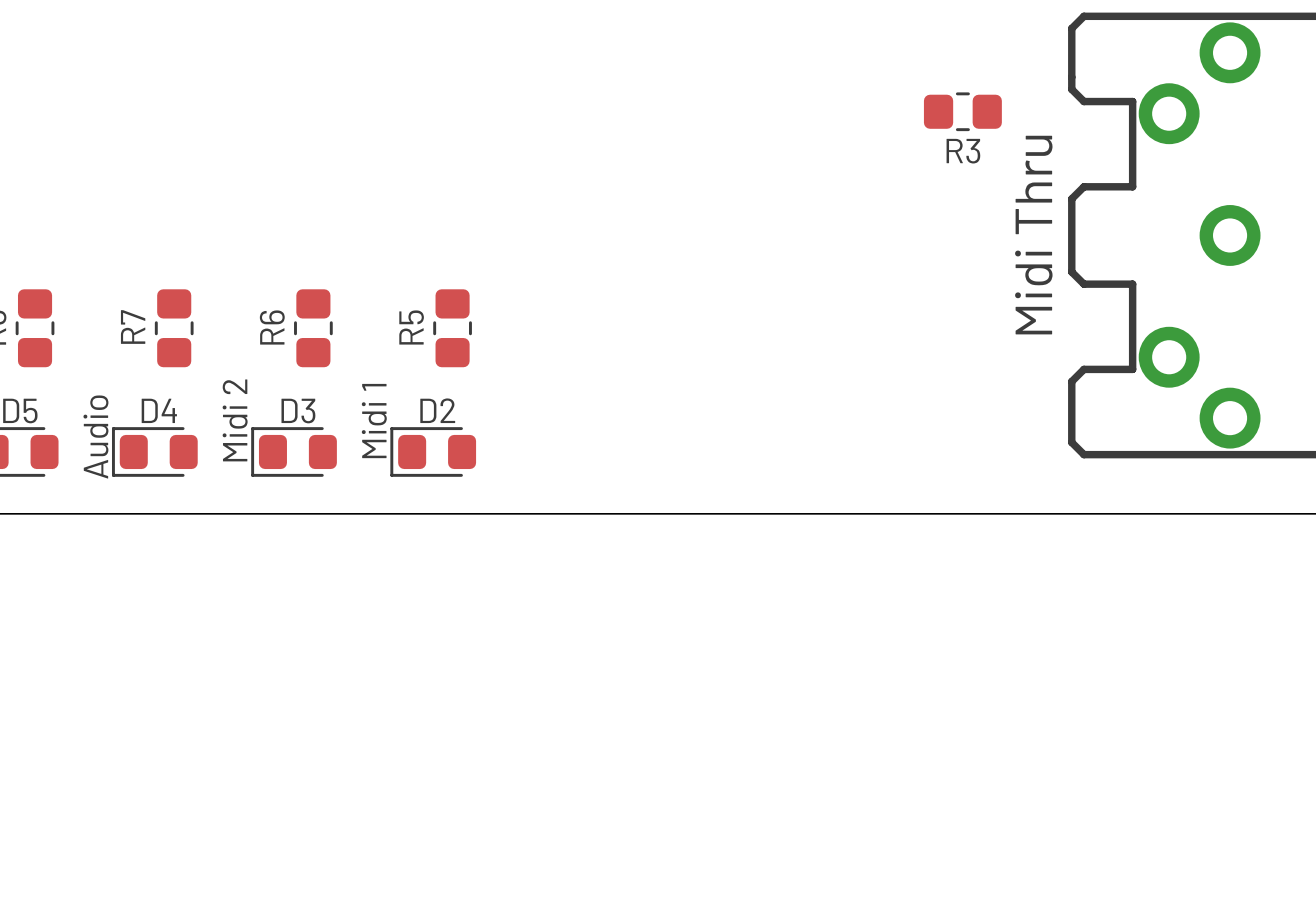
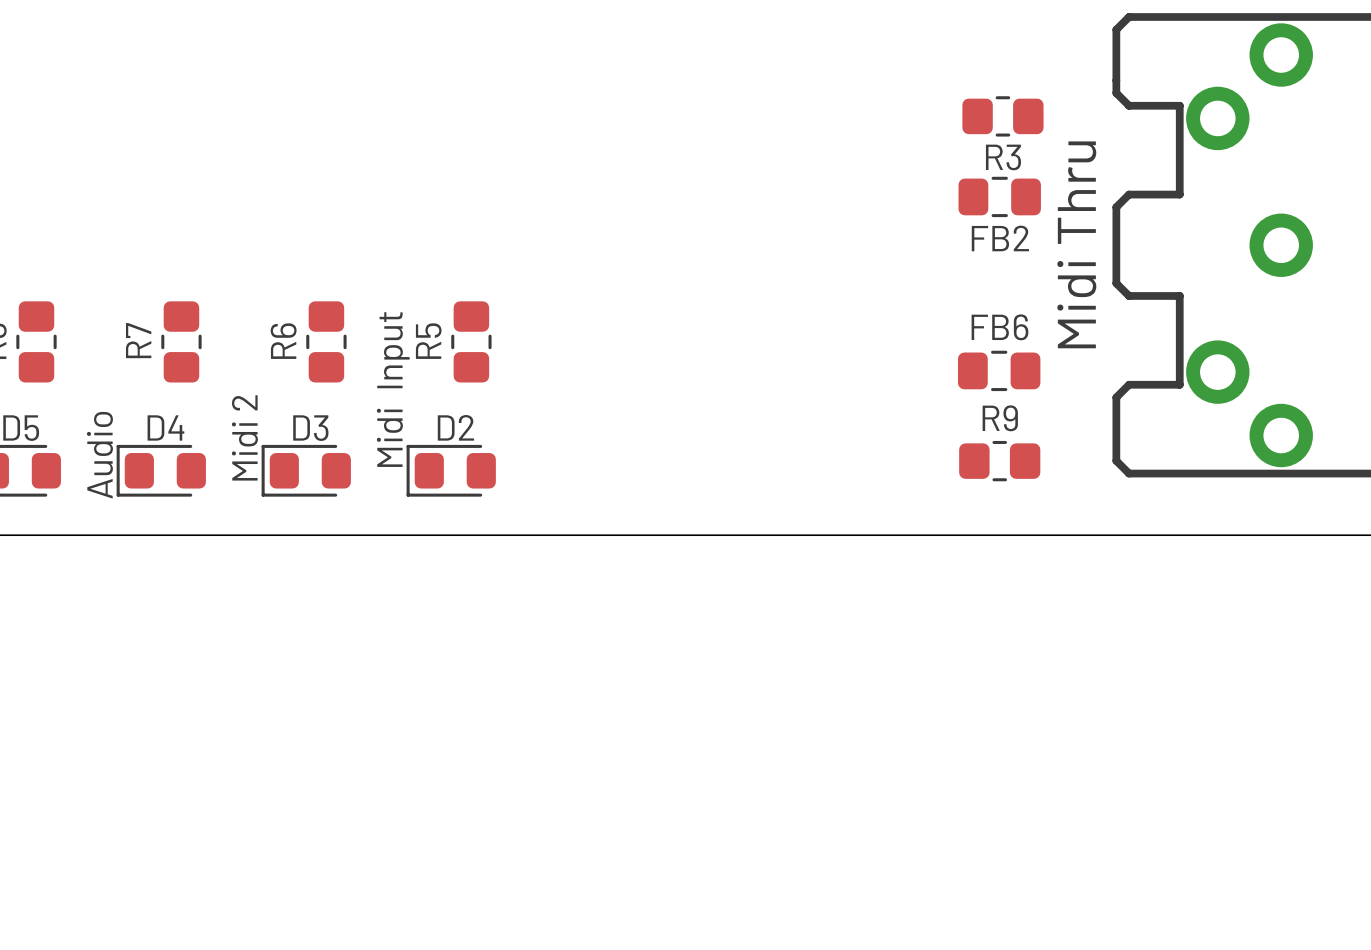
FB2: none -> (999, 196)
FB6: none -> (999, 370)
text: none -> Midi Input (393, 389)
text: Midi 1 (374, 421) -> none
R9: none -> (999, 461)

